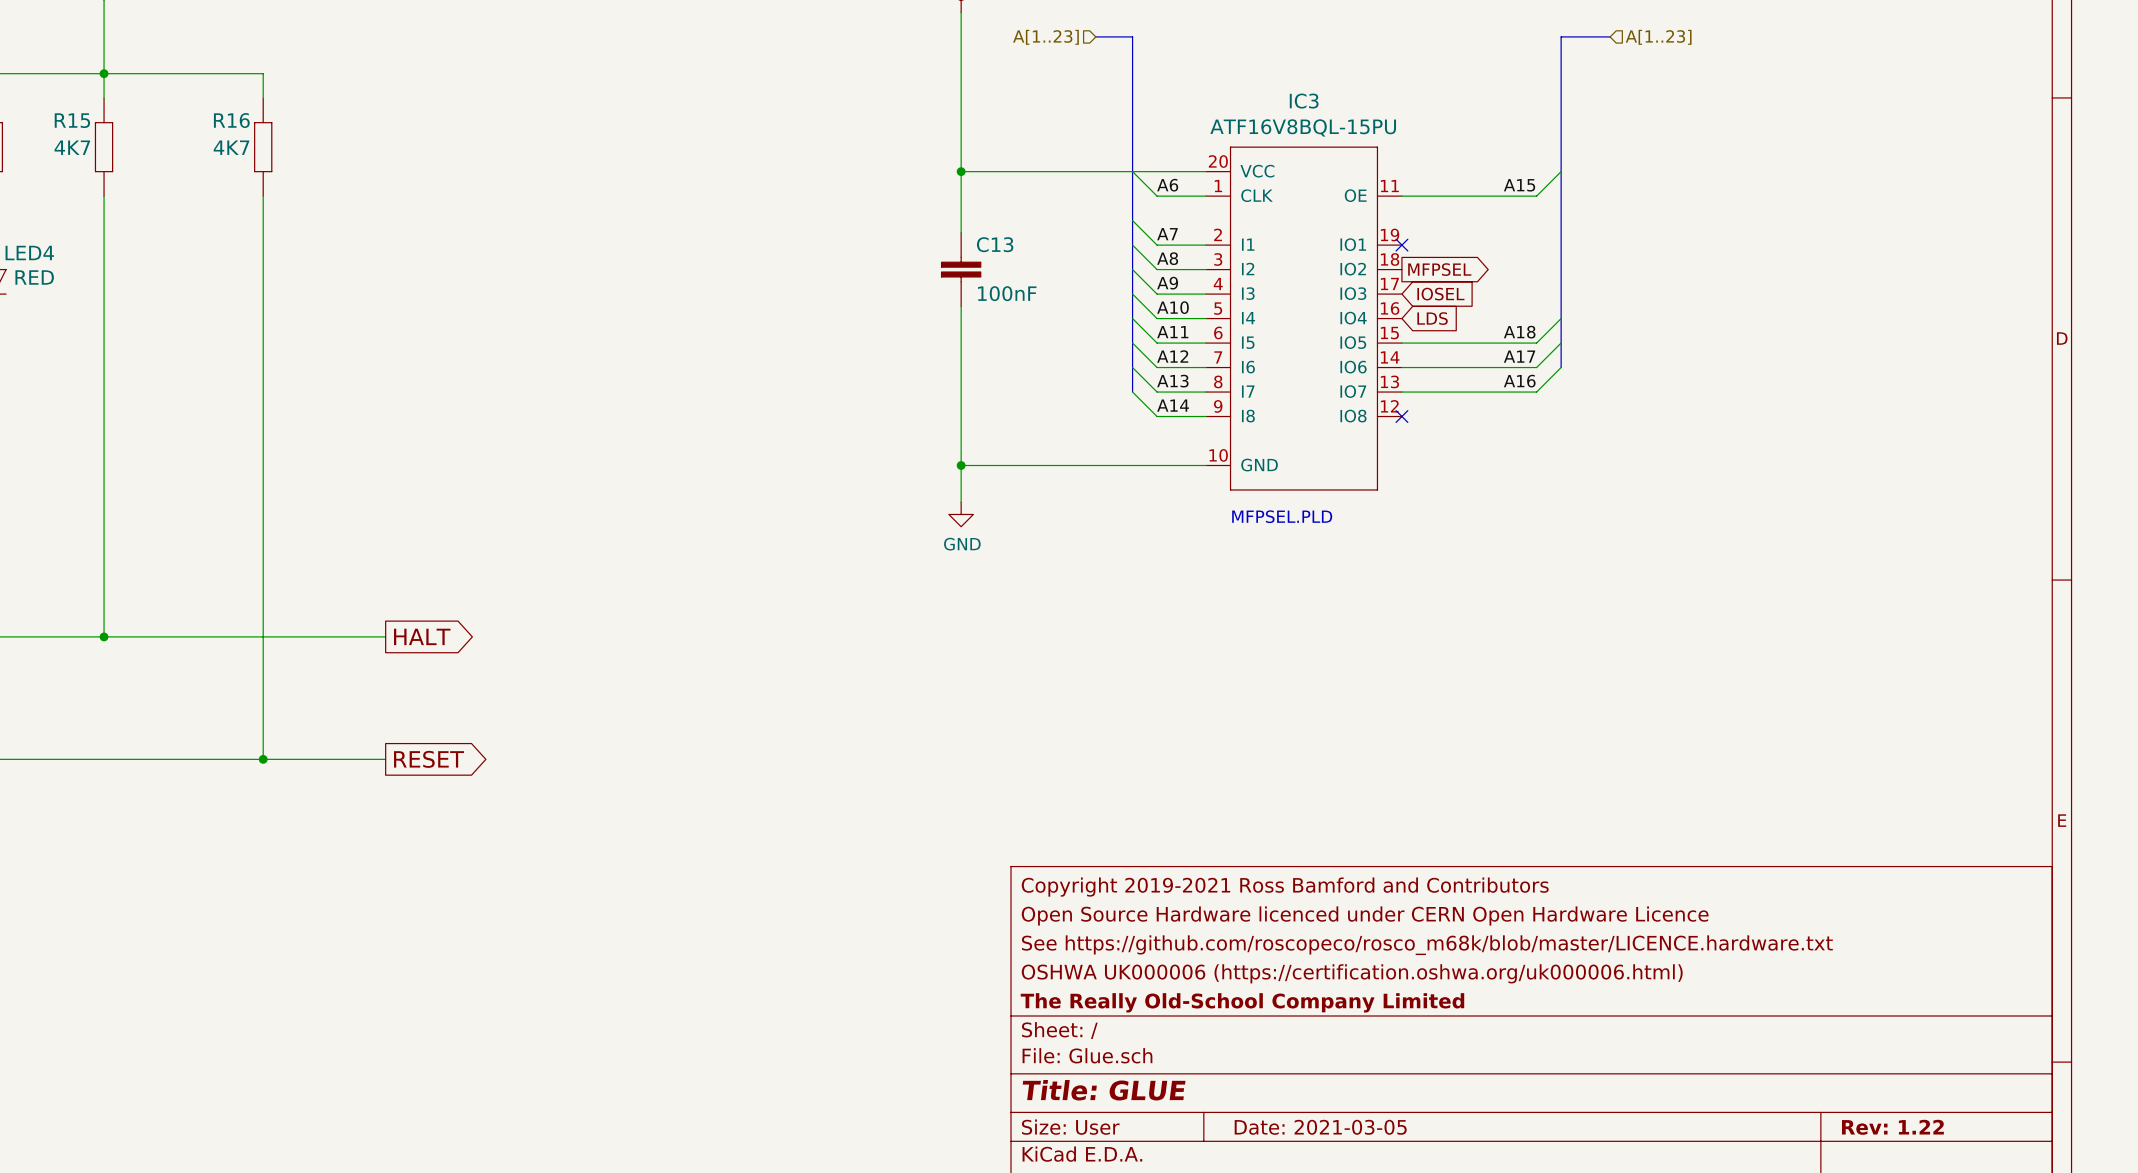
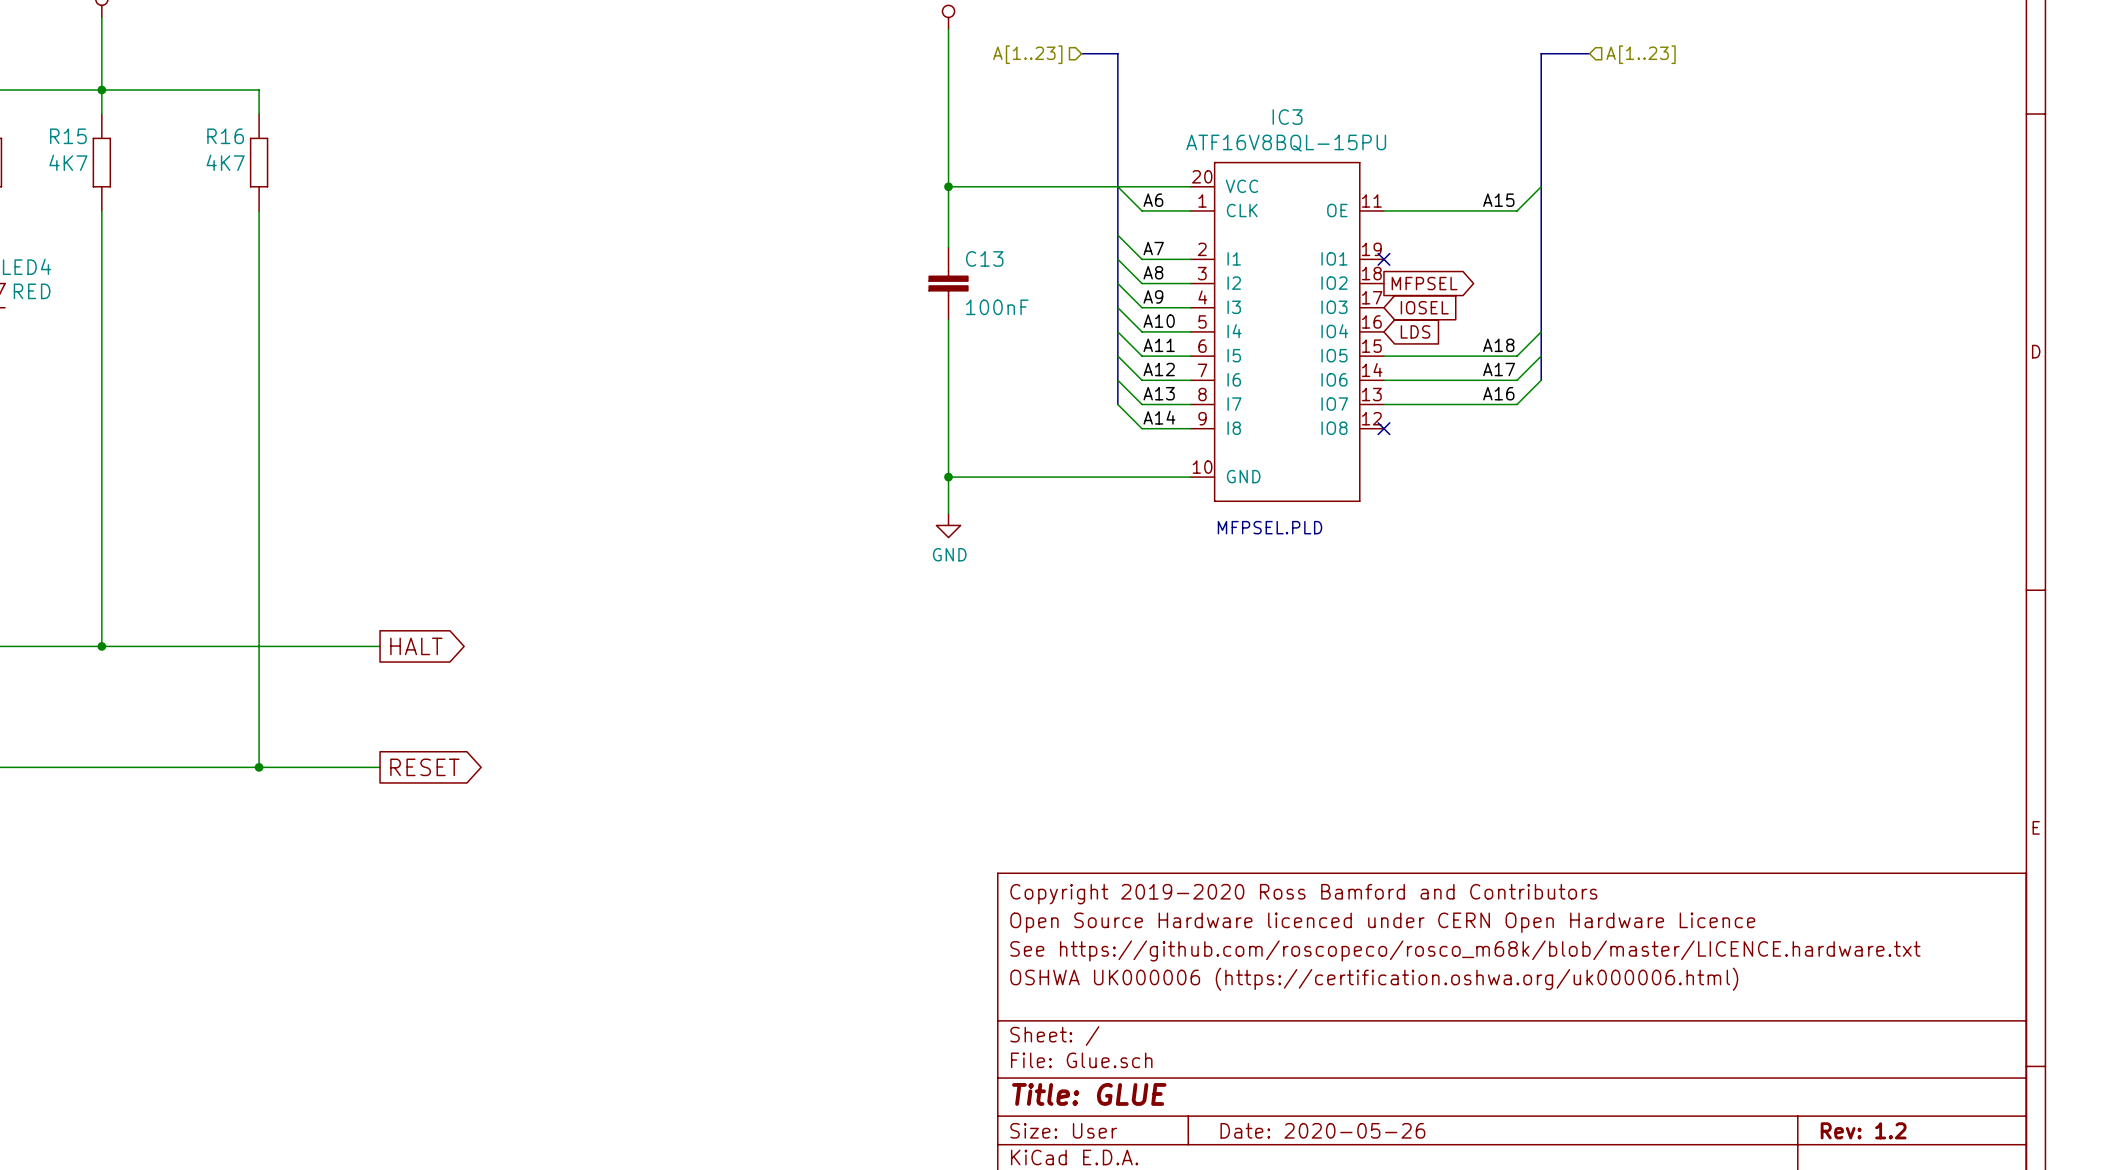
title block: Copyright 2019-2021 Ross Bamford and Contributors (1285, 887) -> Copyright 2019-2020 Ross Bamford and Contributors (1303, 894)
title block: The Really Old-School Company Limited (1242, 1002) -> none
title block: Date: 2021-03-05 (1320, 1127) -> Date: 2020-05-26 (1322, 1130)
title block: Rev: 1.22 (1892, 1127) -> Rev: 1.2 (1863, 1130)

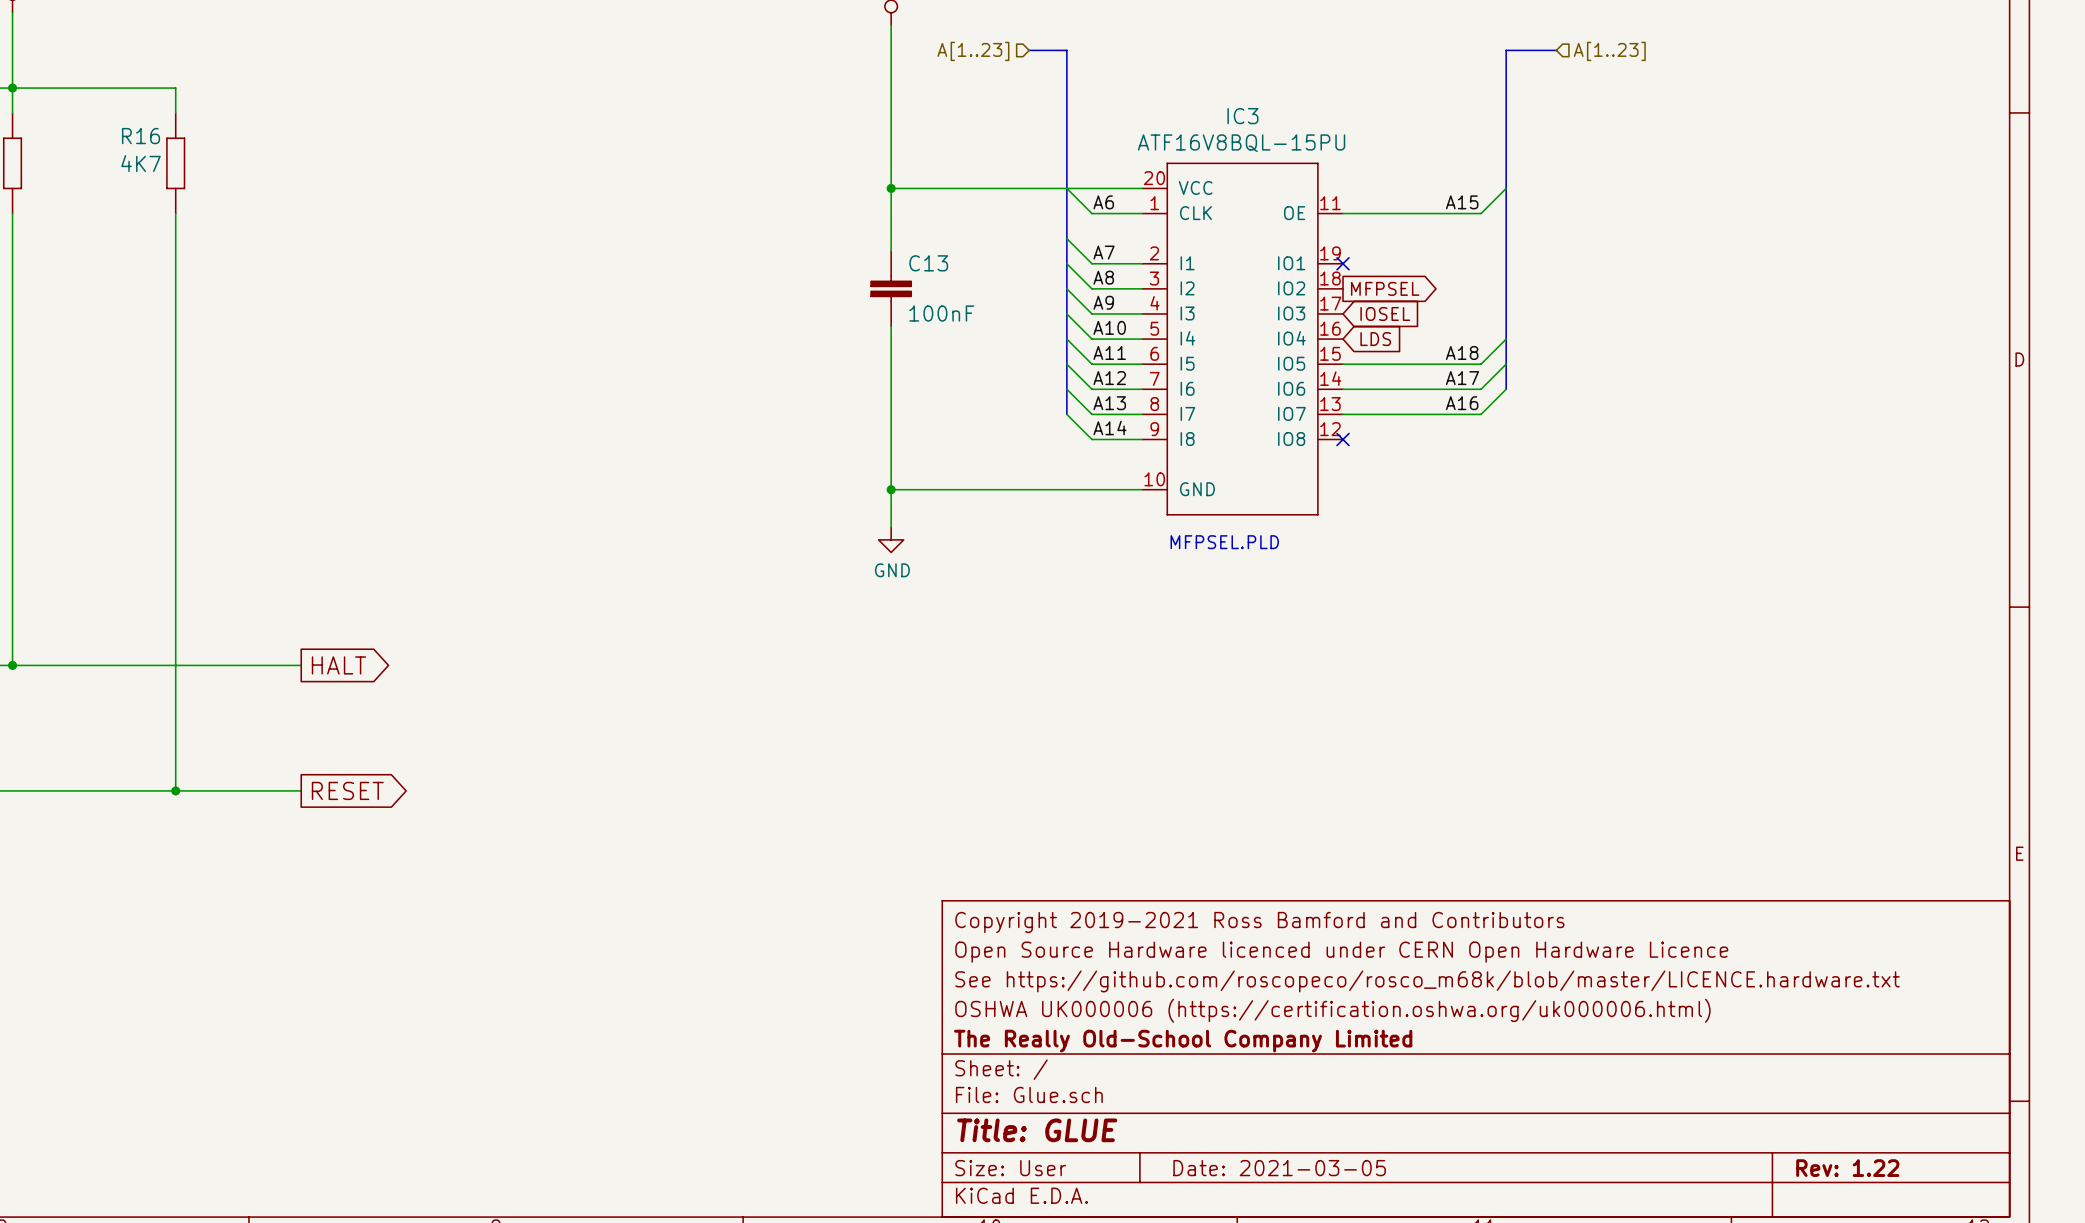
title block: Copyright 2019-2020 Ross Bamford and Contributors (1303, 894) -> Copyright 2019-2021 Ross Bamford and Contributors (1259, 922)
title block: none -> The Really Old-School Company Limited (1183, 1041)
title block: Date: 2020-05-26 (1322, 1130) -> Date: 2021-03-05 (1279, 1168)
title block: Rev: 1.2 (1863, 1130) -> Rev: 1.22 (1847, 1168)

